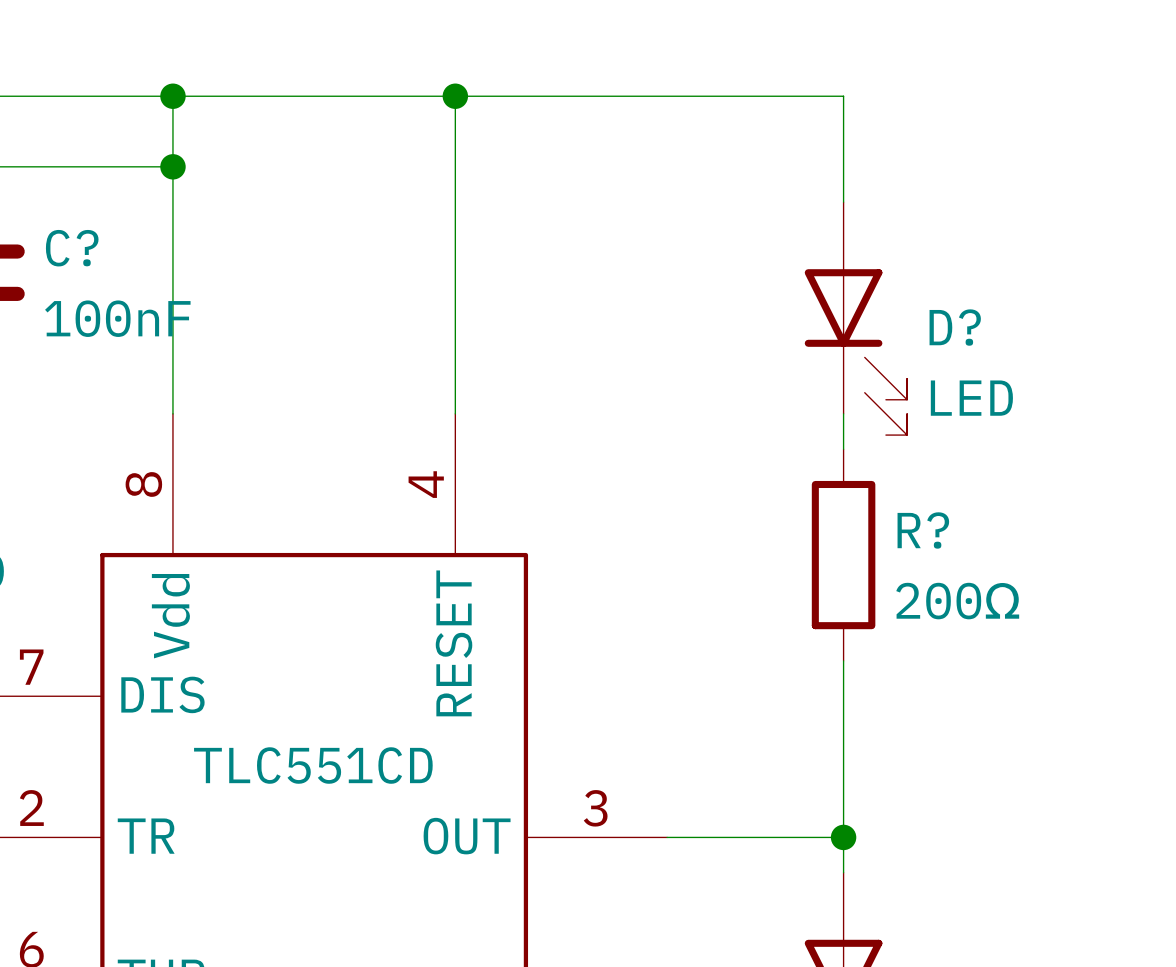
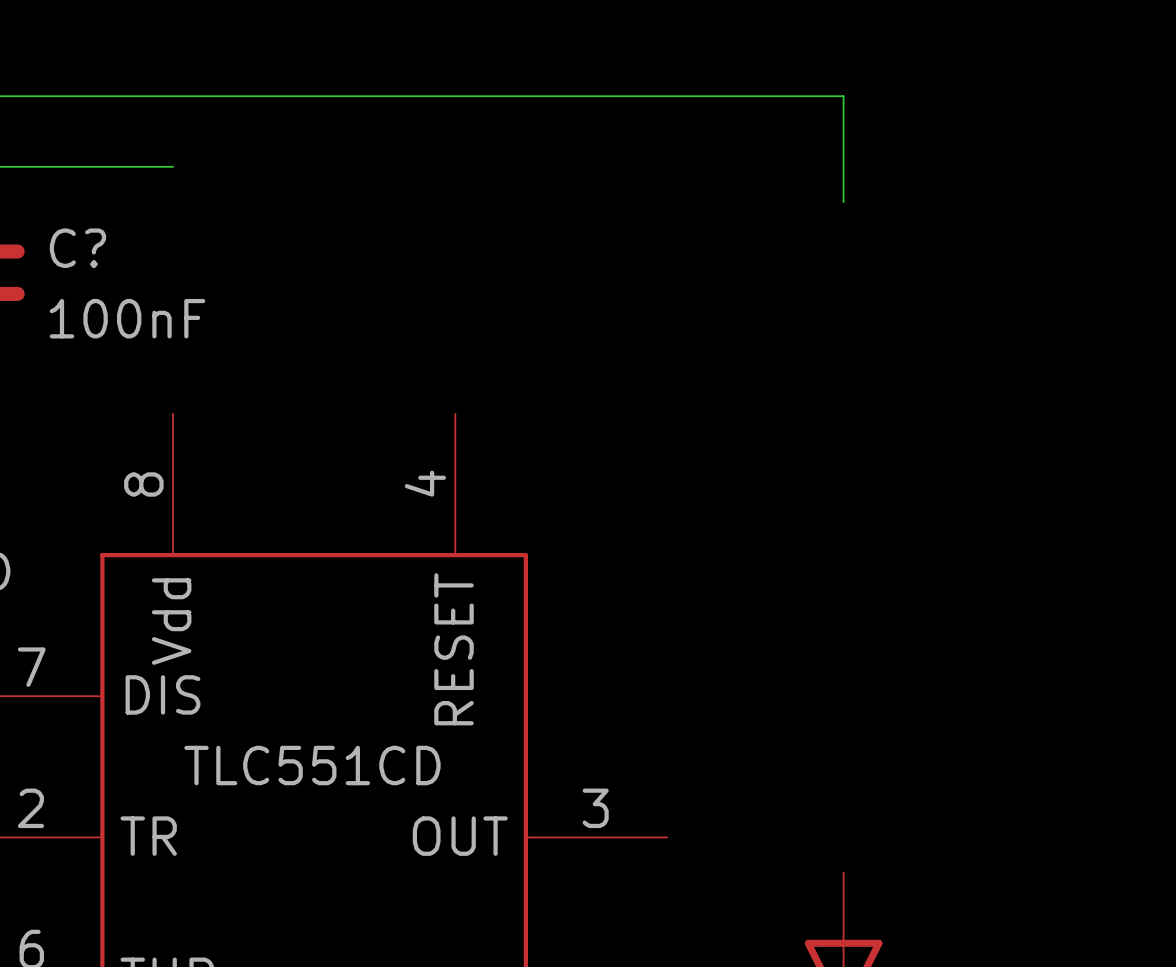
wire: (172, 96) (172, 413) -> none
junction: (172, 96) -> none
wire: (455, 96) (455, 413) -> none
junction: (455, 96) -> none
junction: (172, 166) -> none
D?: LED (855, 318) -> none
wire: (843, 413) (843, 449) -> none
R?: 200Ω (843, 555) -> none
wire: (843, 660) (843, 872) -> none
wire: (667, 837) (843, 837) -> none
junction: (843, 837) -> none

